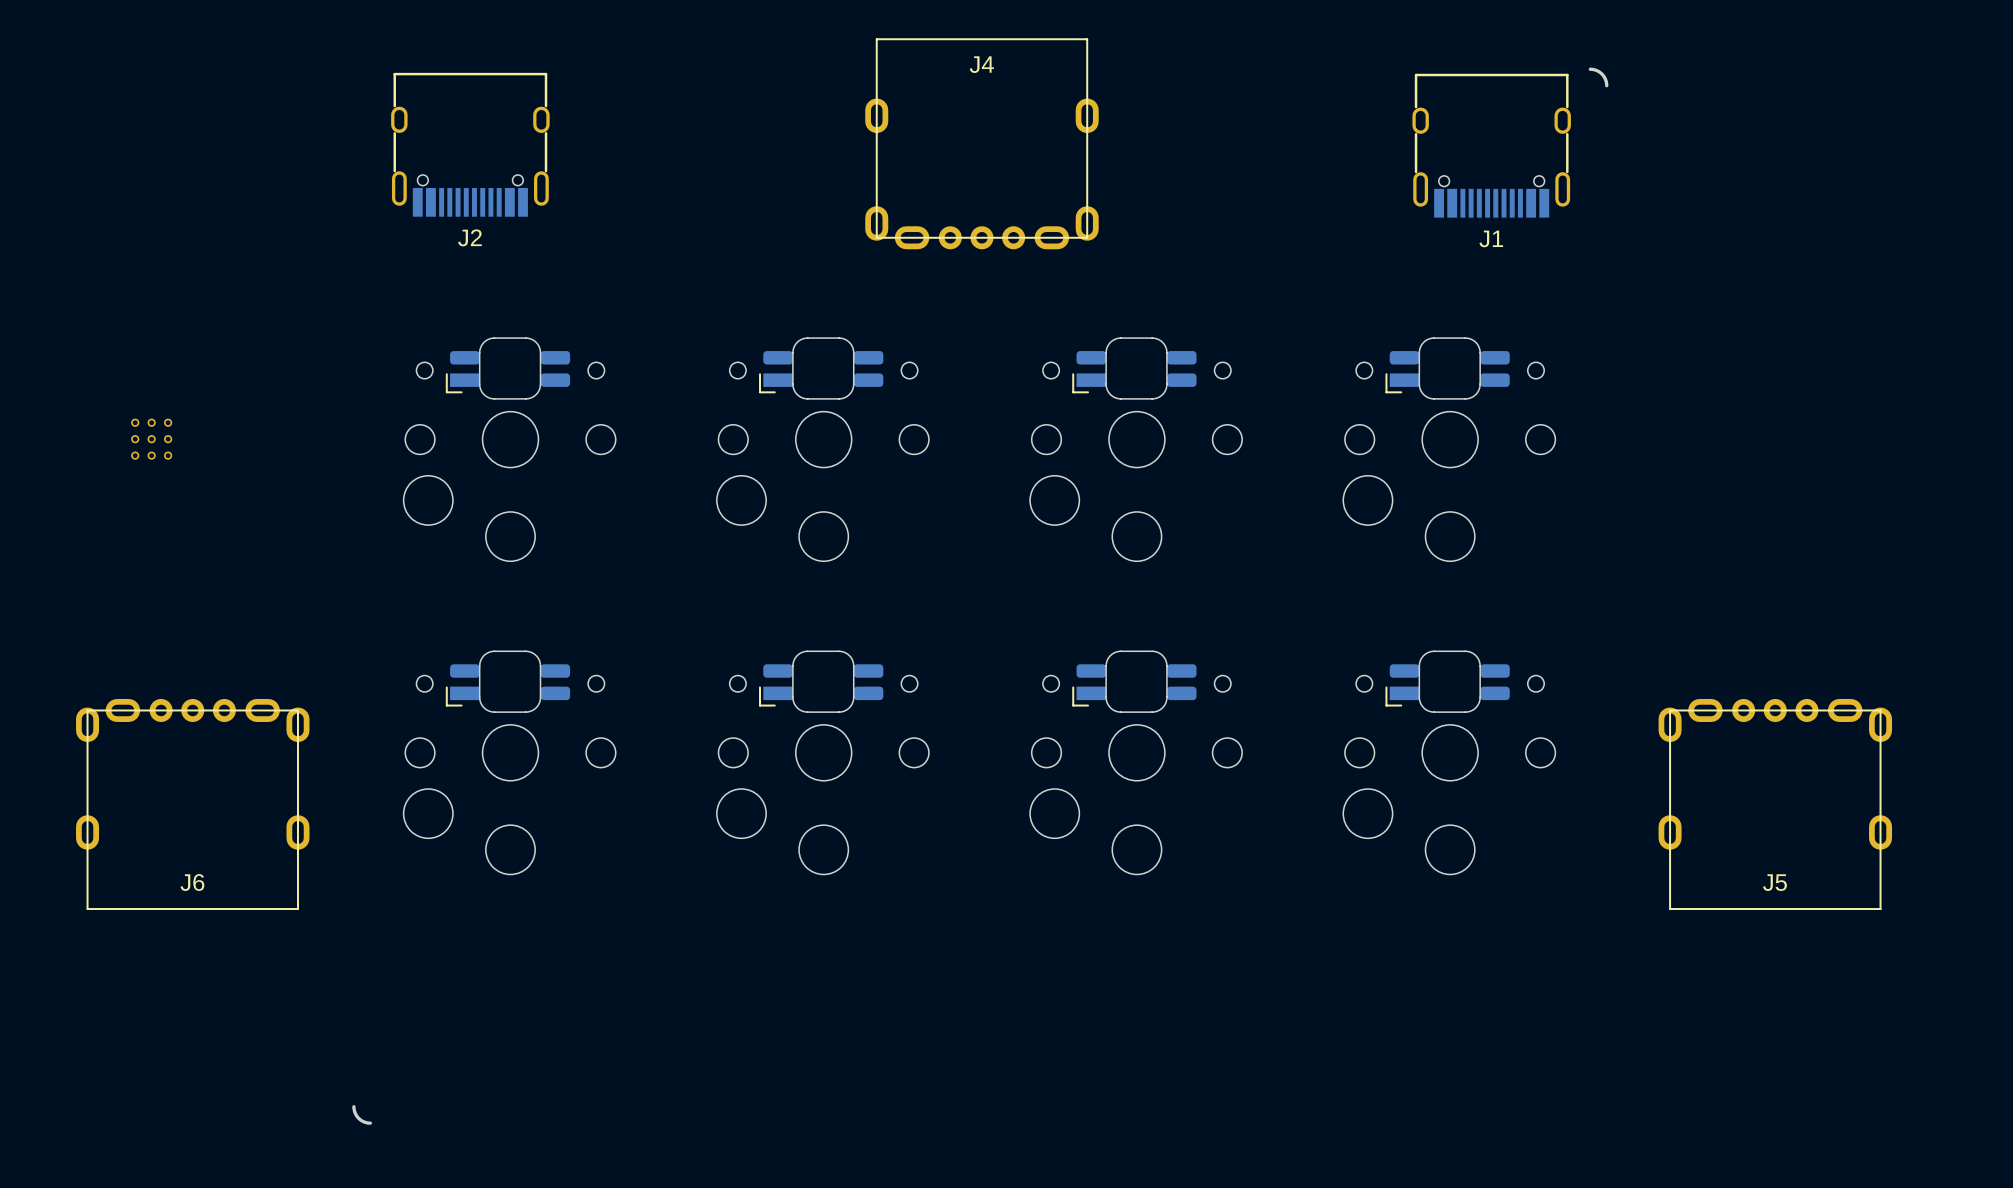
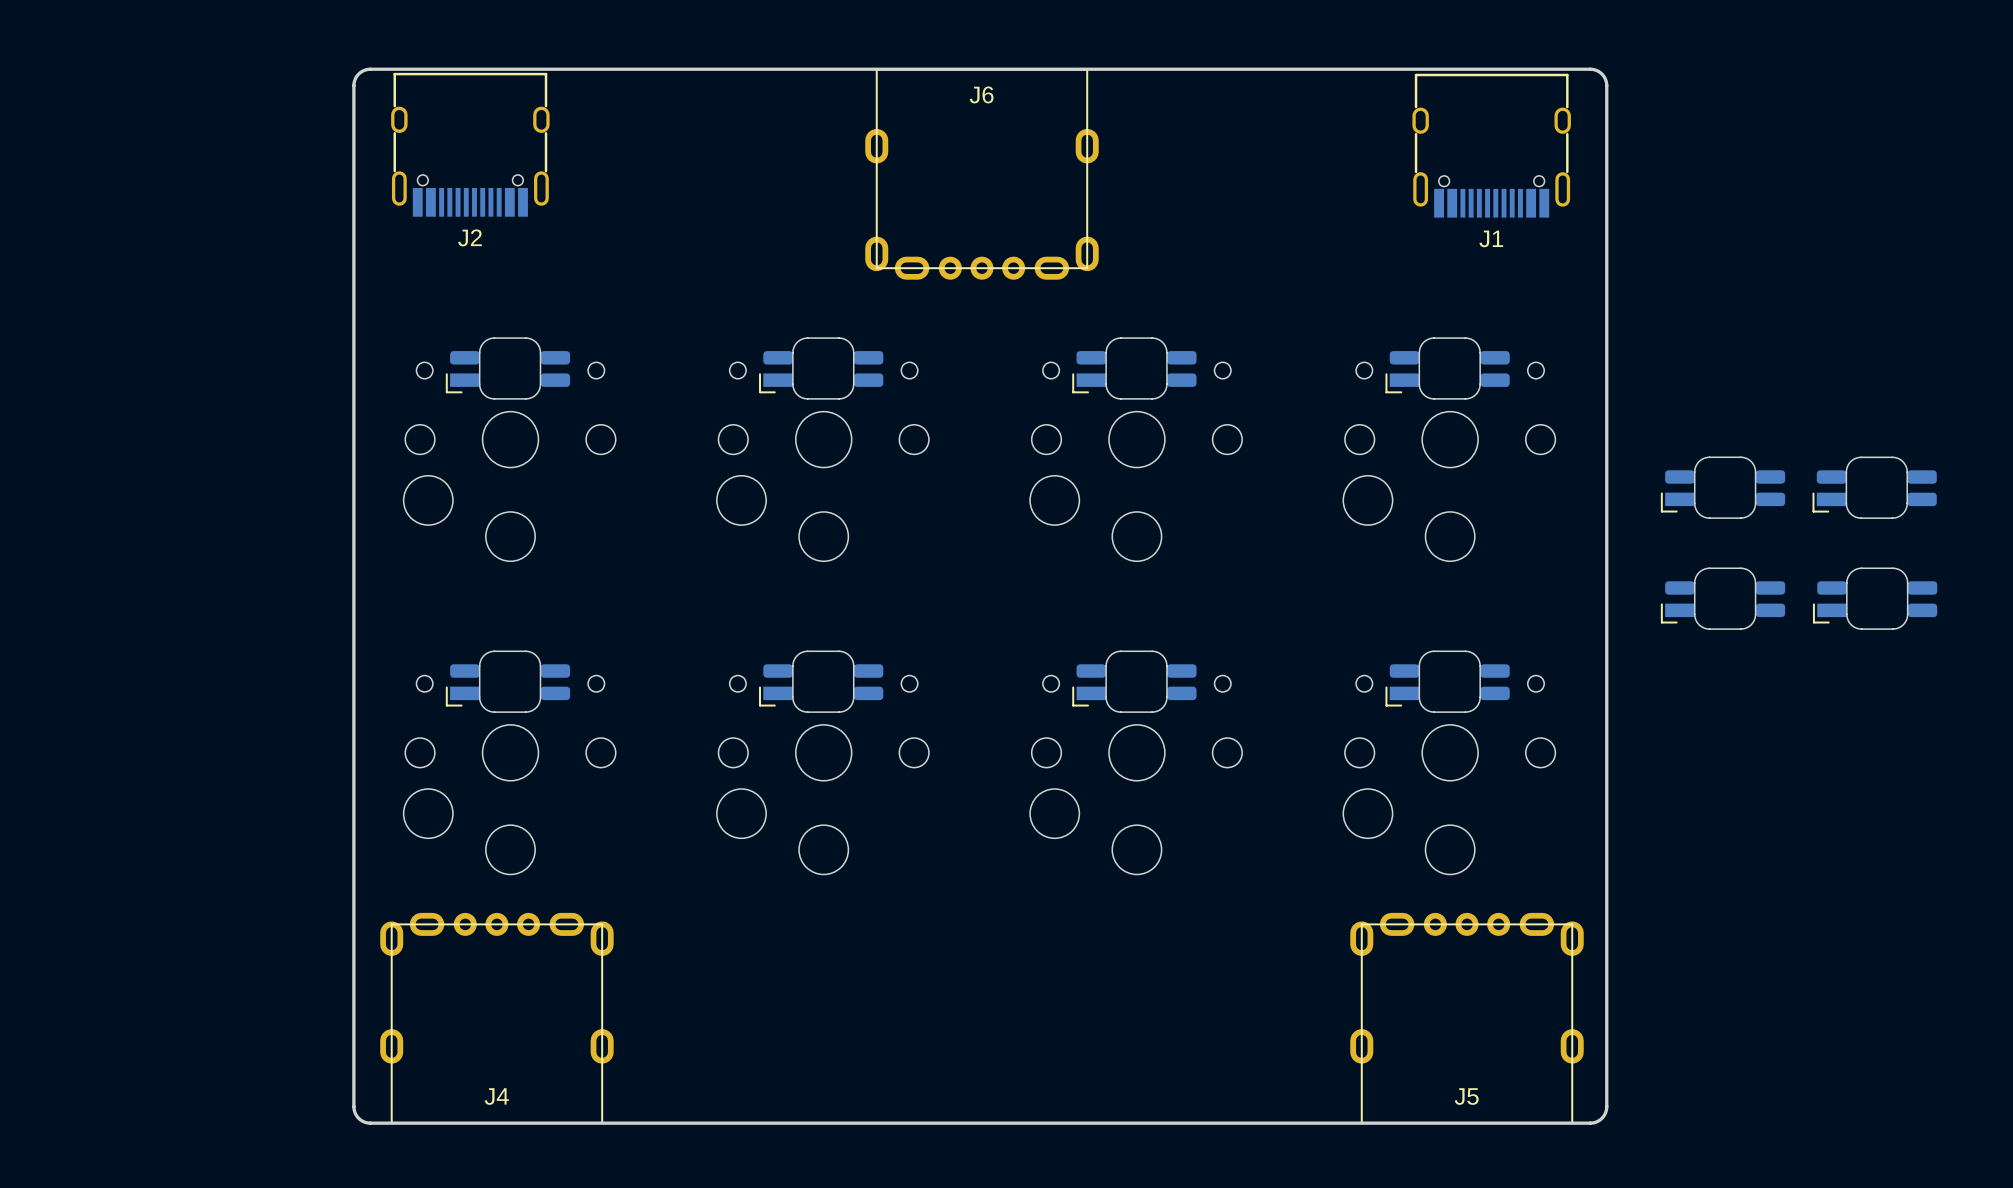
board edge: none -> (1590, 69) (370, 69) (360, 72) (355, 79) (353, 85) (353, 1106)
board edge: none -> (1606, 85) (1606, 1106) (1605, 1113) (1600, 1119) (1590, 1123) (370, 1123)
J4 rotation: 0° (981, 143) -> 180° (496, 1018)
J4 position: (981, 143) -> (496, 1018)
part: (151, 439) -> none
part: none -> (1723, 487)
part: none -> (1874, 487)
part: none -> (1723, 598)
part: none -> (1875, 598)
J6 rotation: 0° (192, 804) -> 180° (981, 174)
J6 position: (192, 804) -> (981, 174)
J5 position: (1775, 804) -> (1467, 1018)

